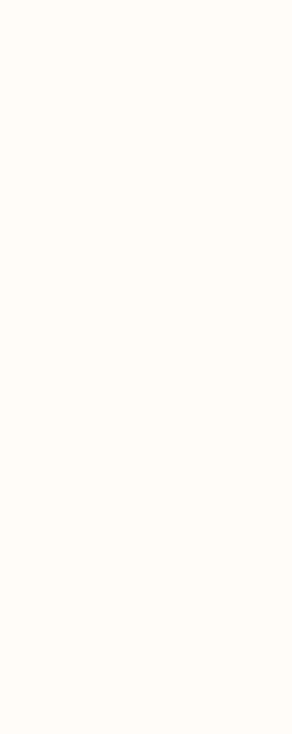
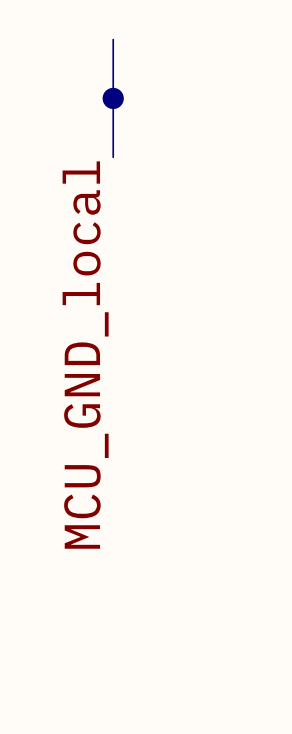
wire: none -> (113, 39) (113, 157)
junction: none -> (113, 98)
label: none -> MCU_GND_local (85, 355)

